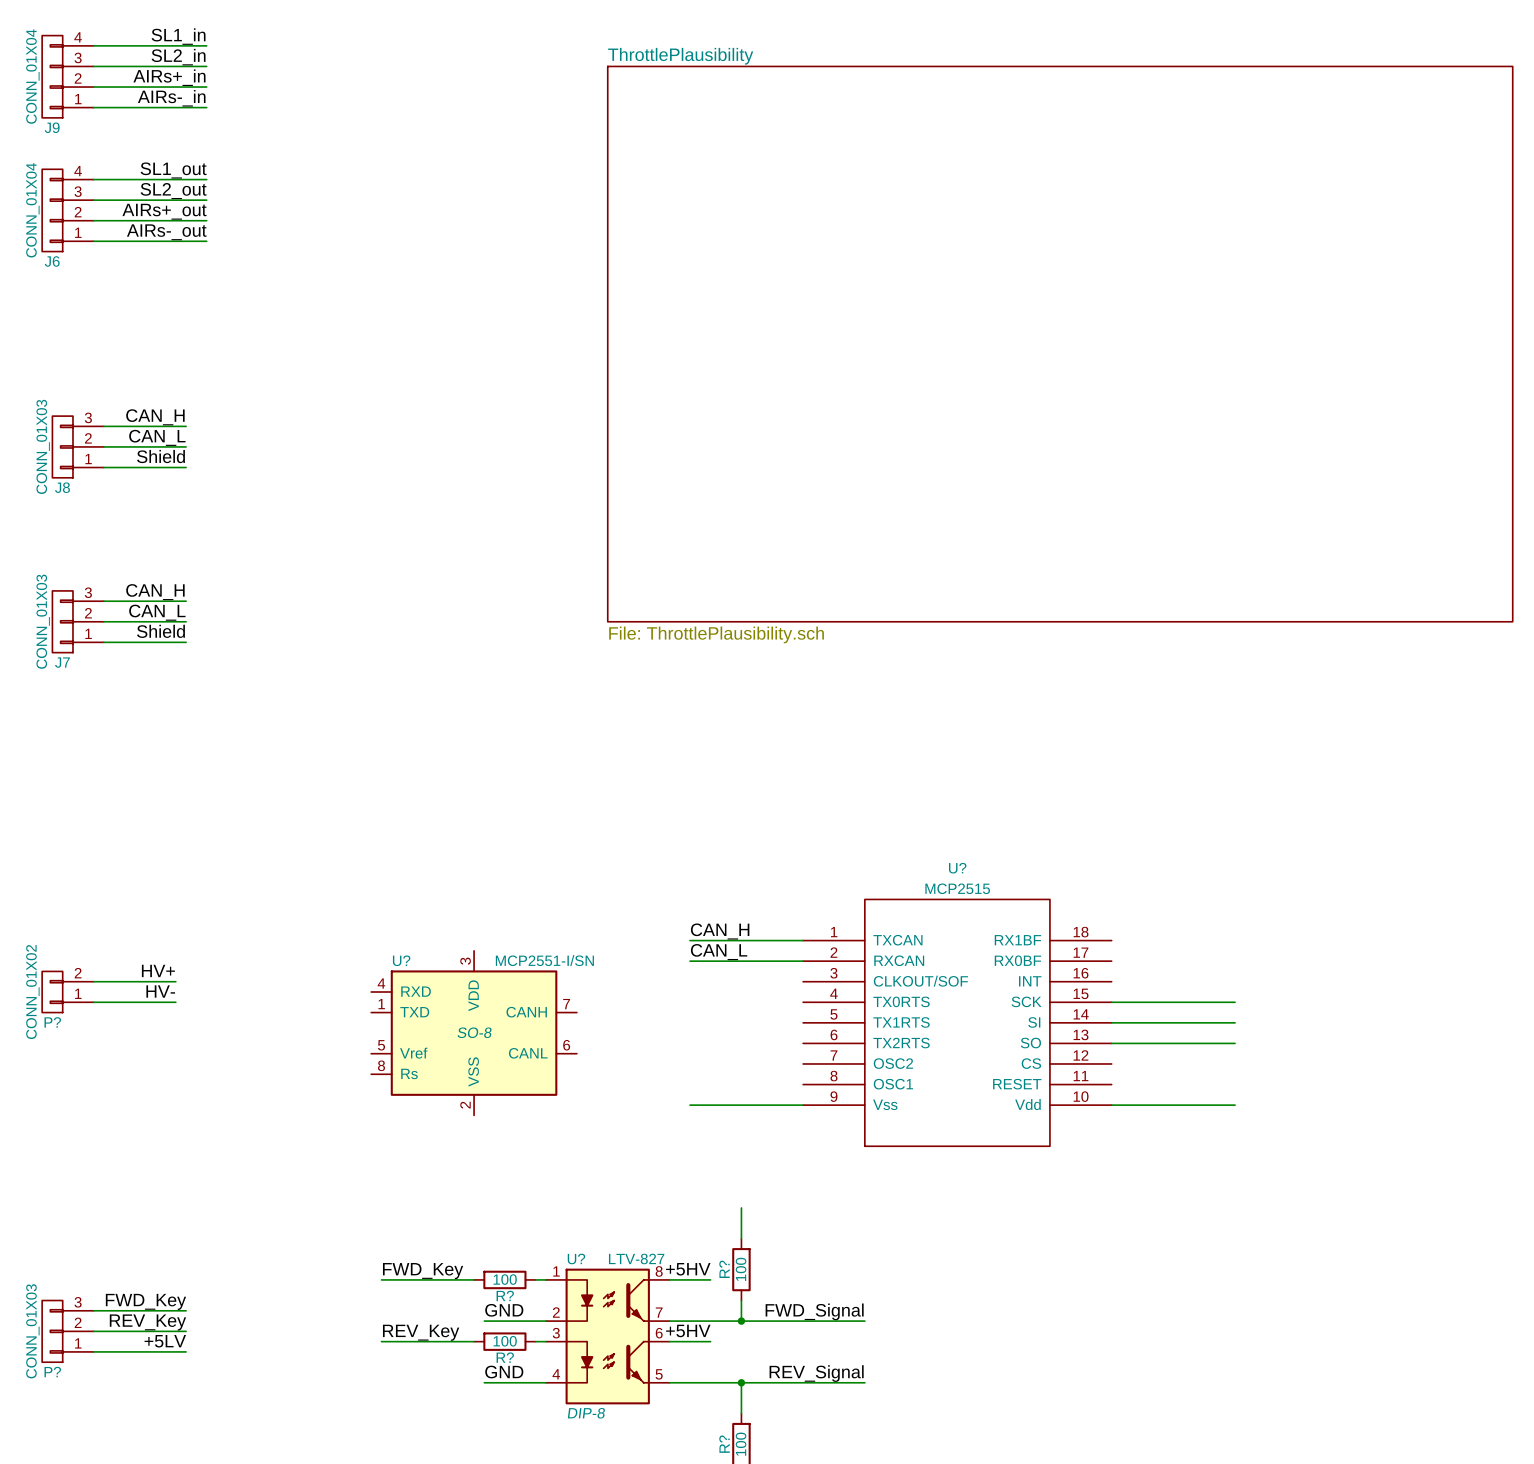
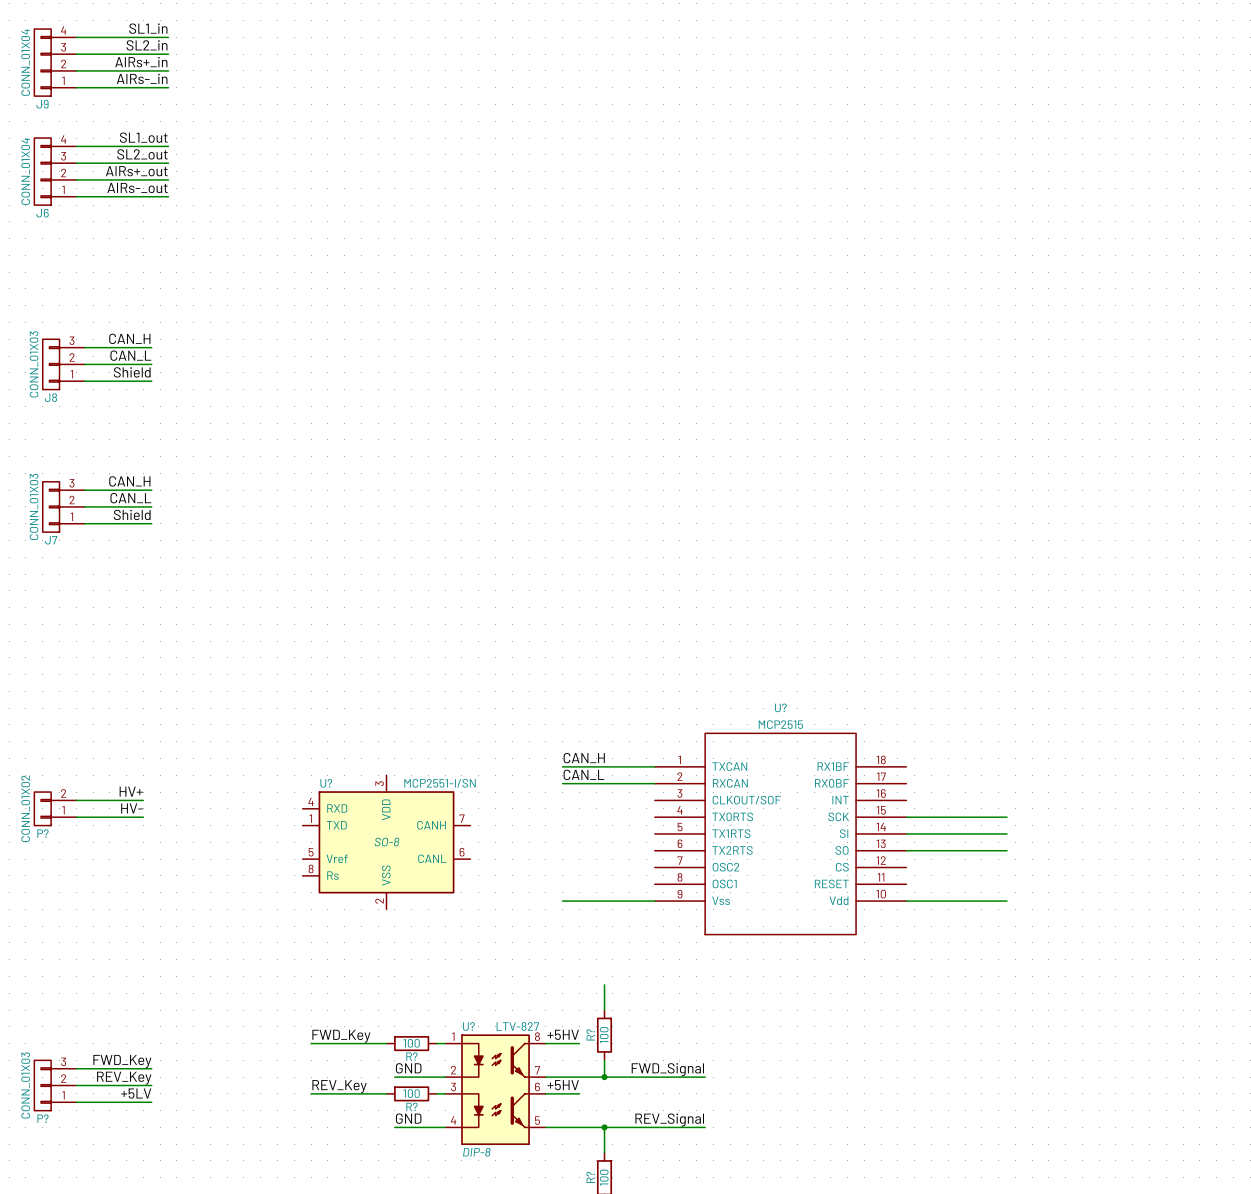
sheet ThrottlePlausibility: File: ThrottlePlausibility.sch (1060, 344) -> none

